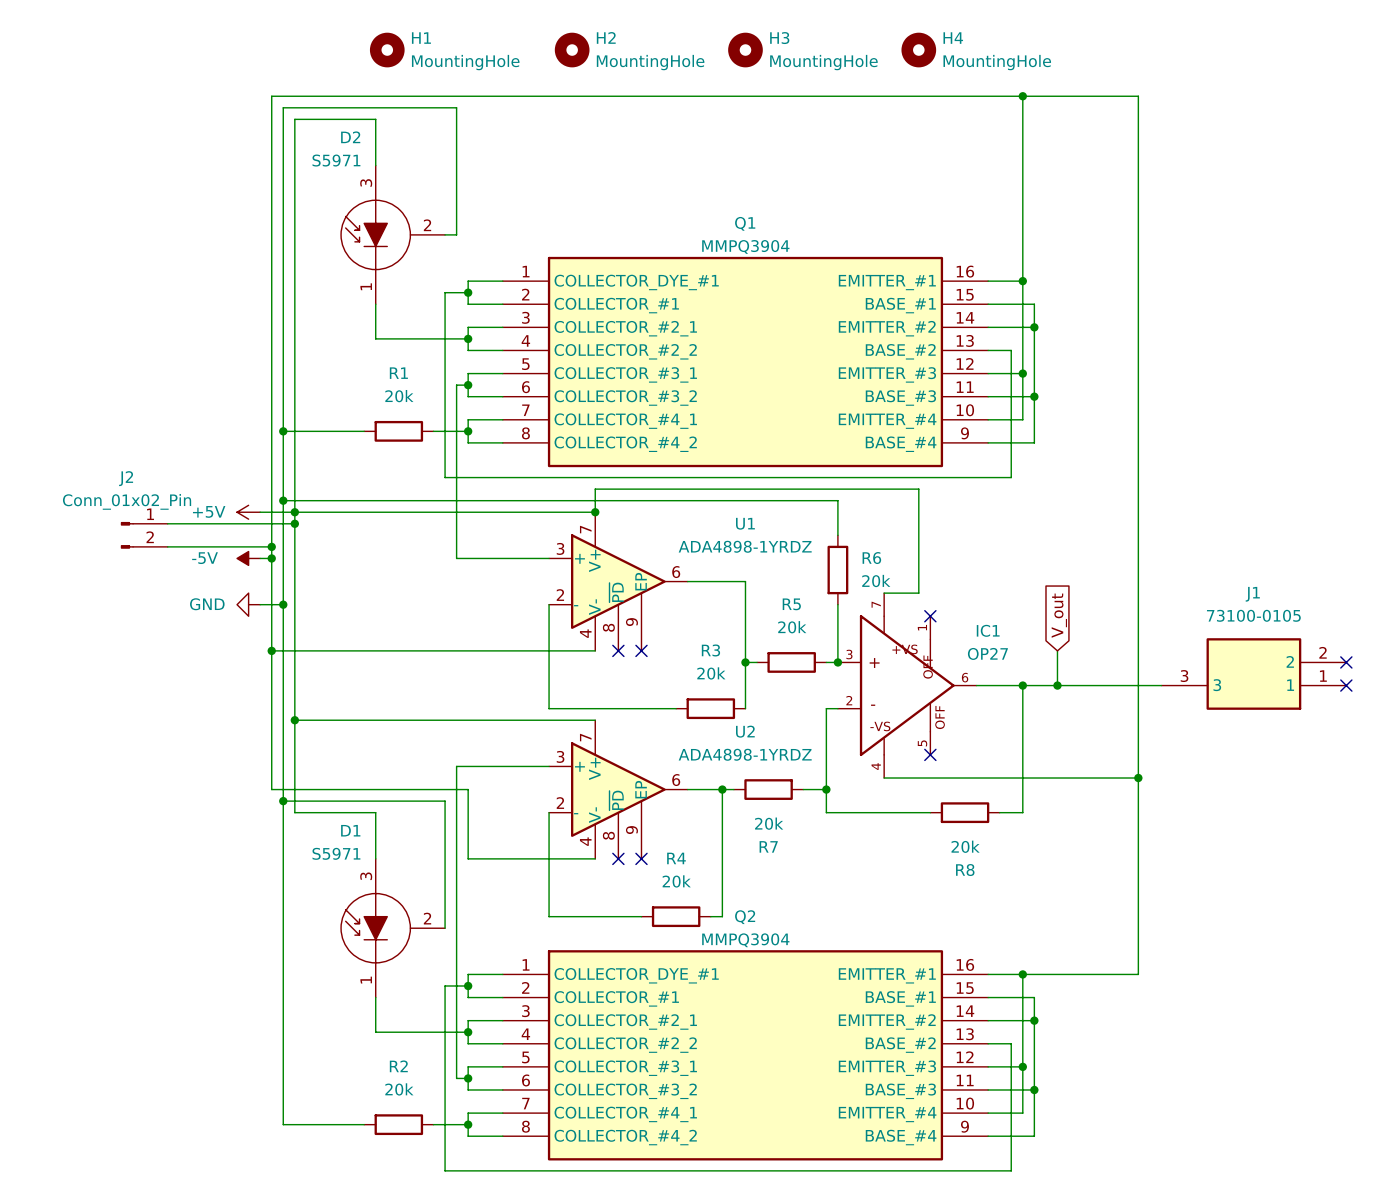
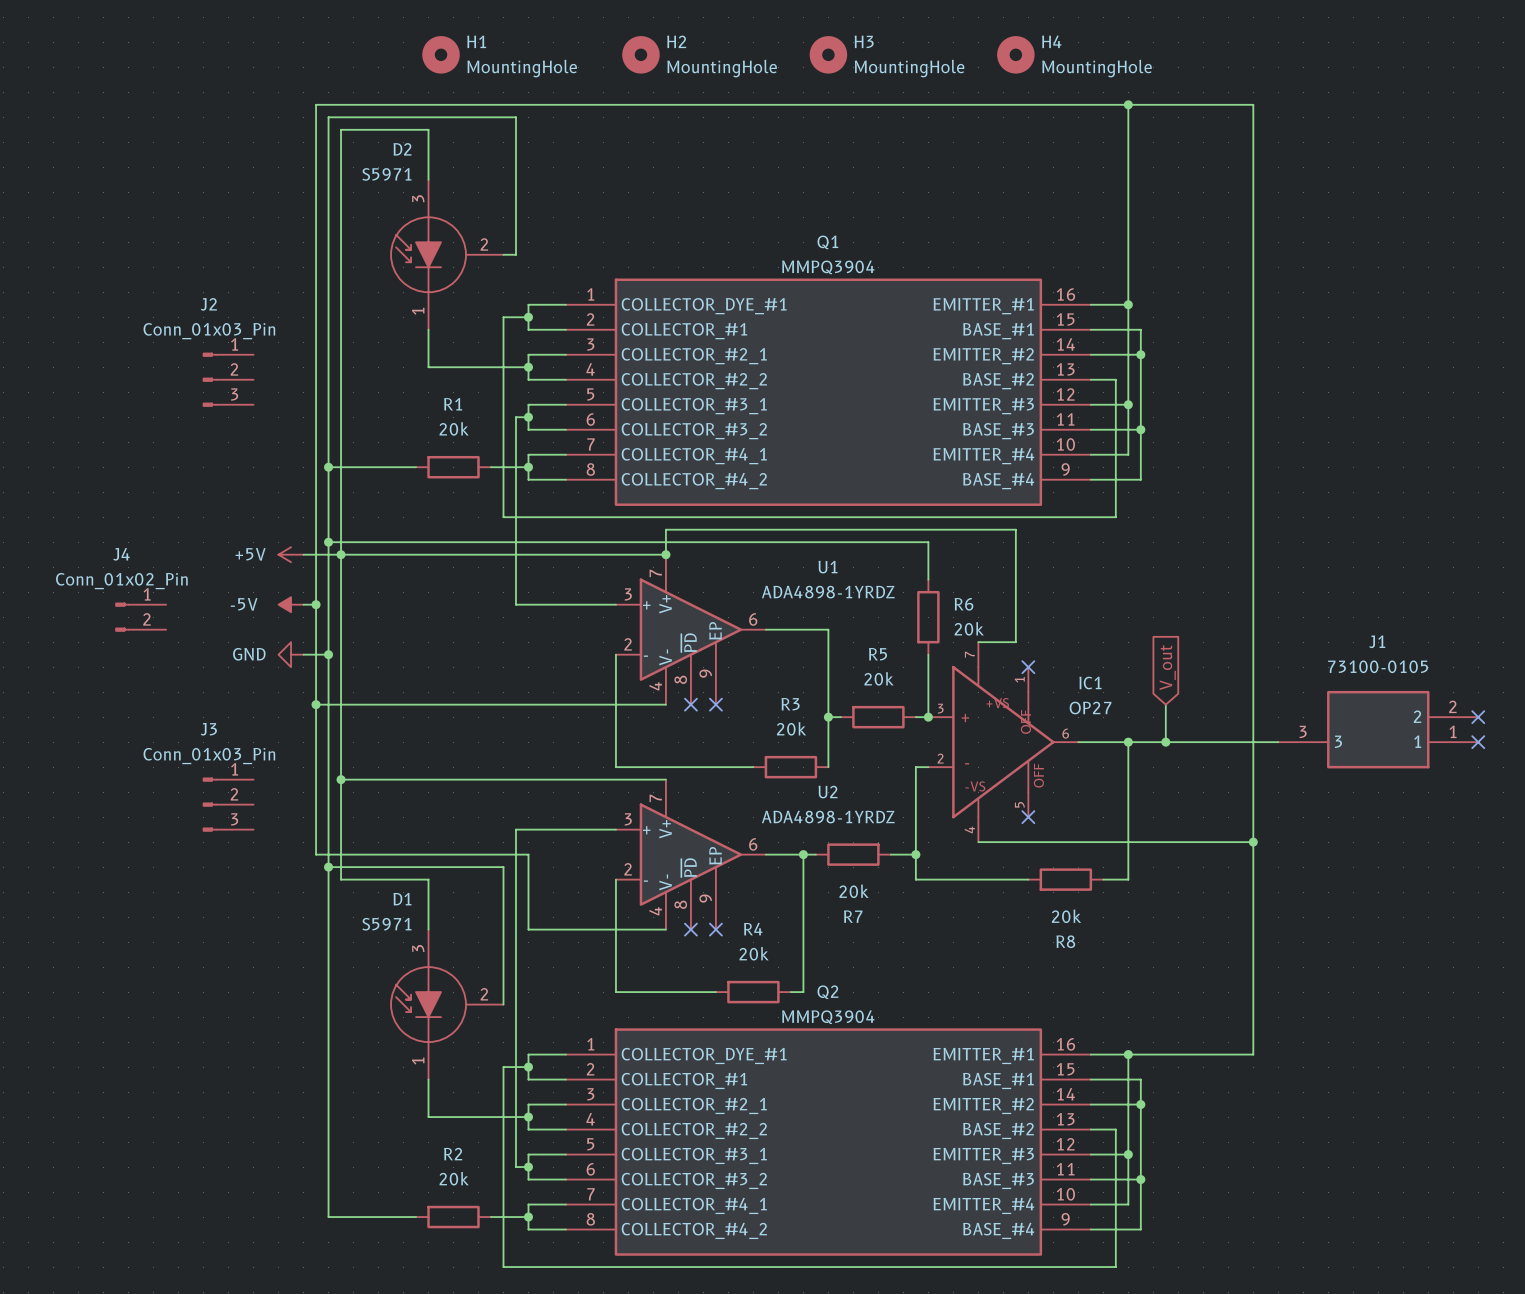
J2 value: Conn_01x02_Pin (127, 501) -> Conn_01x03_Pin (209, 331)
J2 symbol: [120, 521, 168, 549] -> [202, 352, 254, 407]
wire: (167, 523) (294, 523) -> none
junction: (294, 523) -> none
wire: (167, 546) (271, 546) -> none
junction: (271, 546) -> none
J4: none -> Conn_01x02_Pin (140, 617)
J3: none -> Conn_01x03_Pin (228, 804)

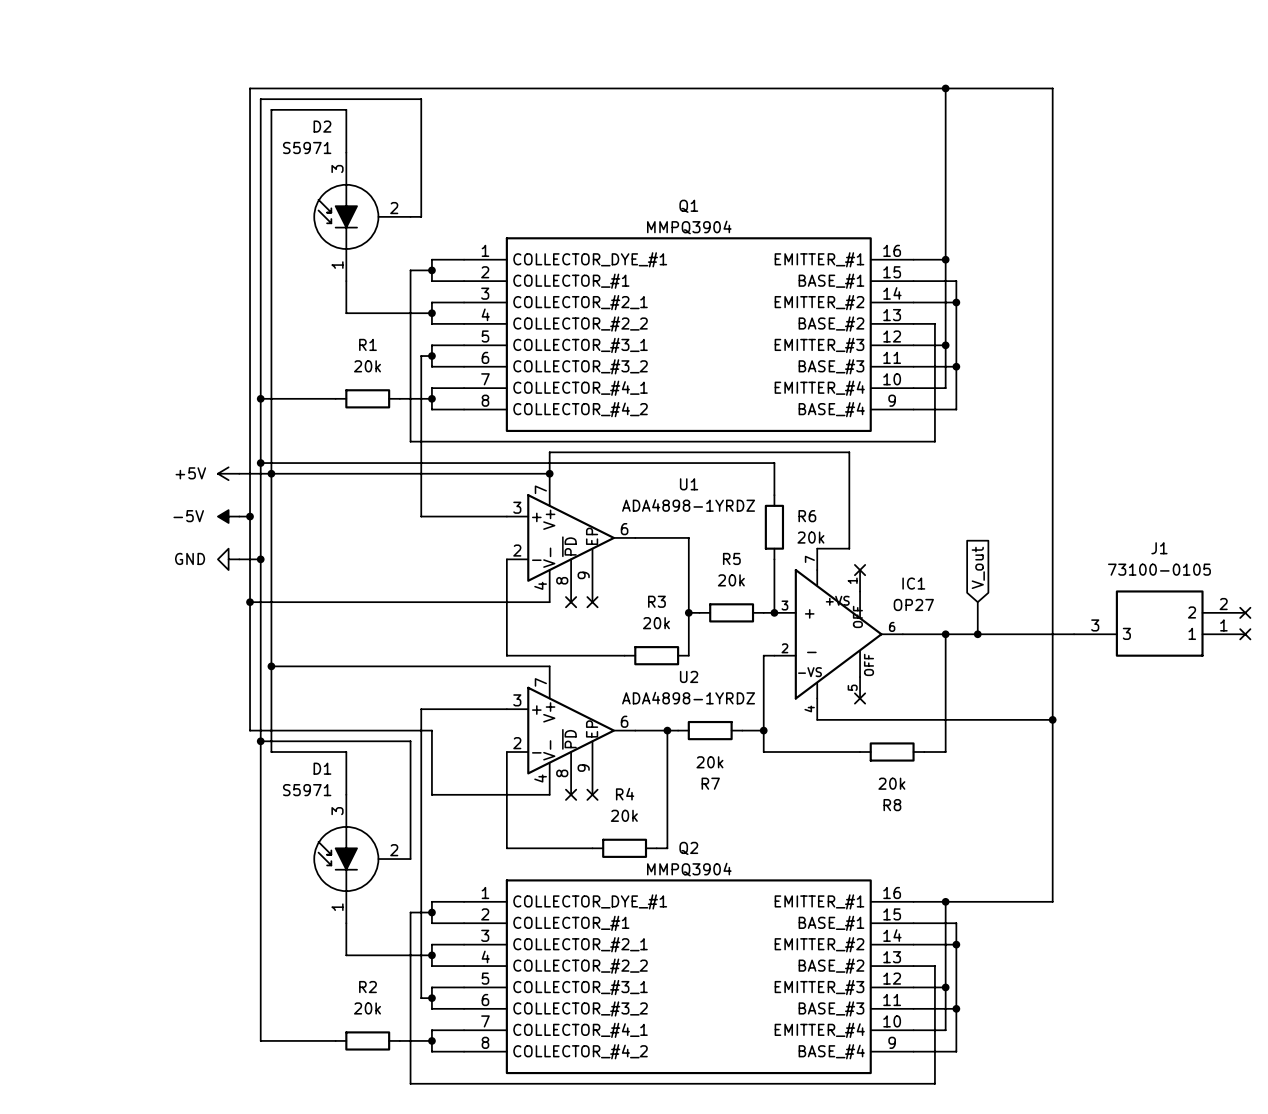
H1: MountingHole (441, 54) -> none
H2: MountingHole (640, 54) -> none
H3: MountingHole (828, 54) -> none
H4: MountingHole (1015, 54) -> none
J2: Conn_01x03_Pin (228, 379) -> none
J4: Conn_01x02_Pin (140, 617) -> none
J3: Conn_01x03_Pin (228, 804) -> none

